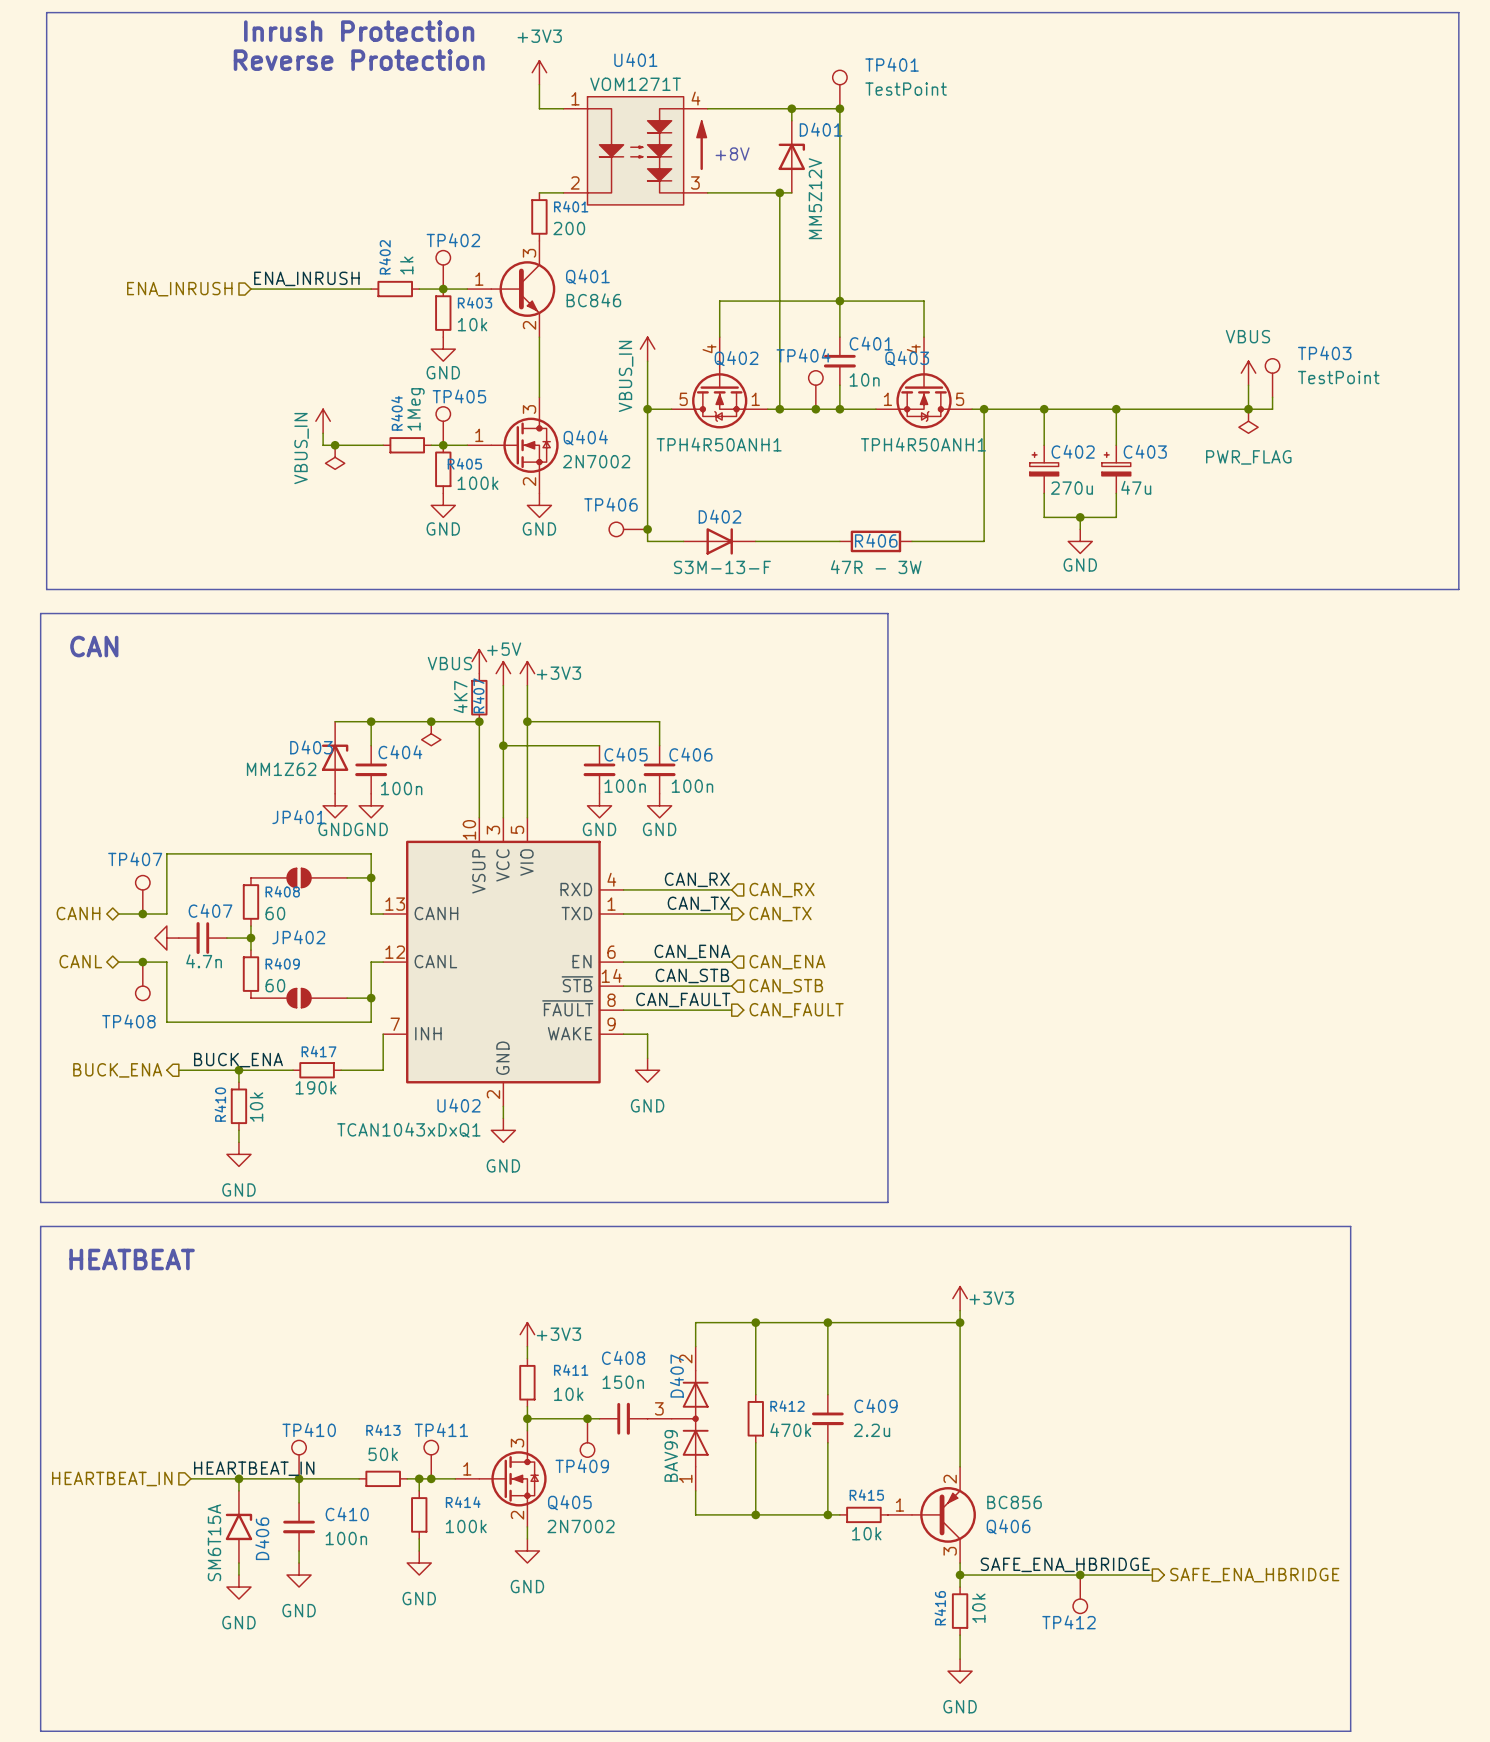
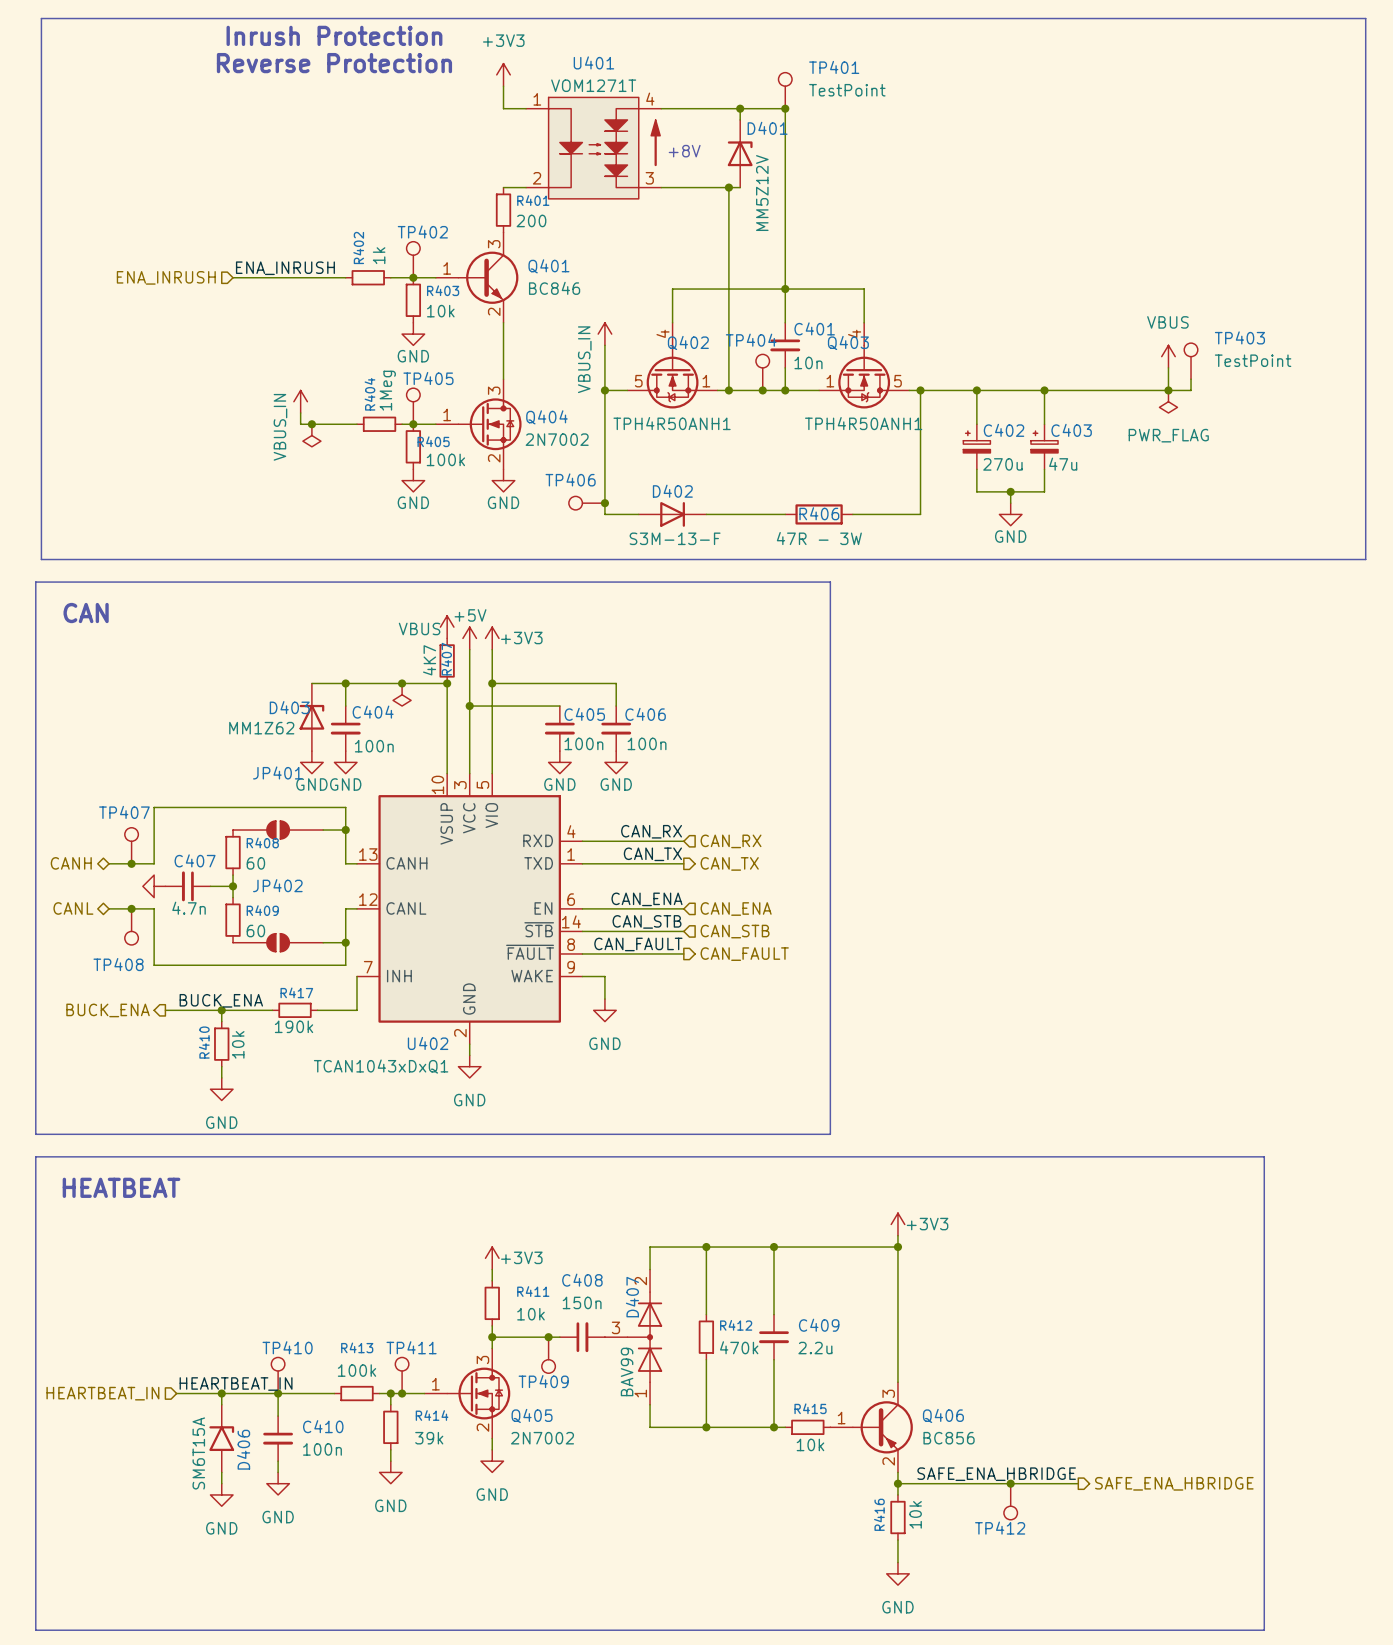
R413 value: 50k (383, 1454) -> 100k (356, 1370)
Q406 flip: as is (943, 1514) -> up-down (882, 1427)
R414 value: 100k (466, 1526) -> 39k (429, 1438)

